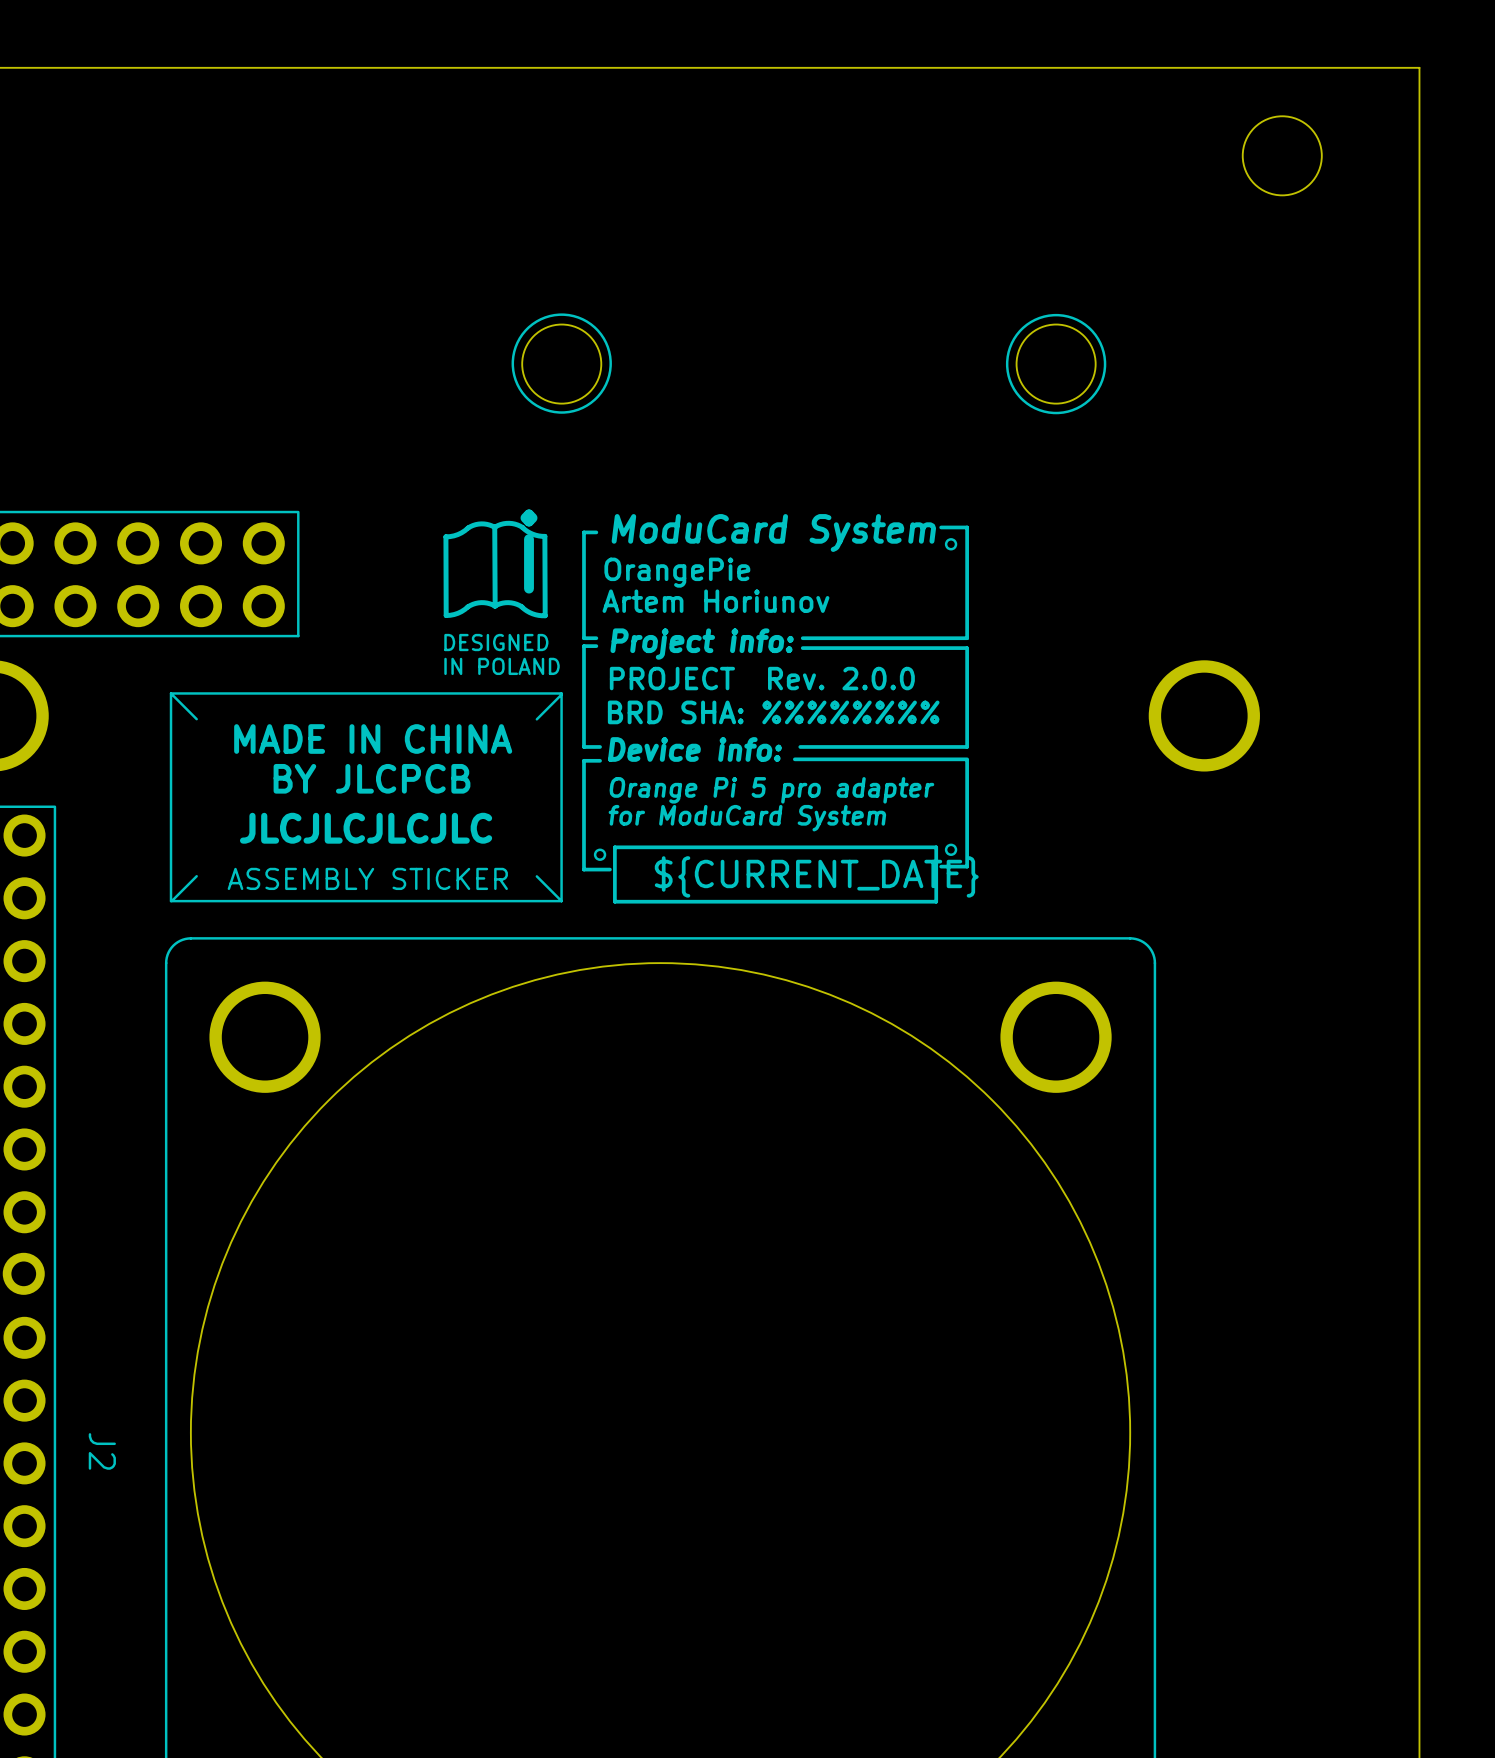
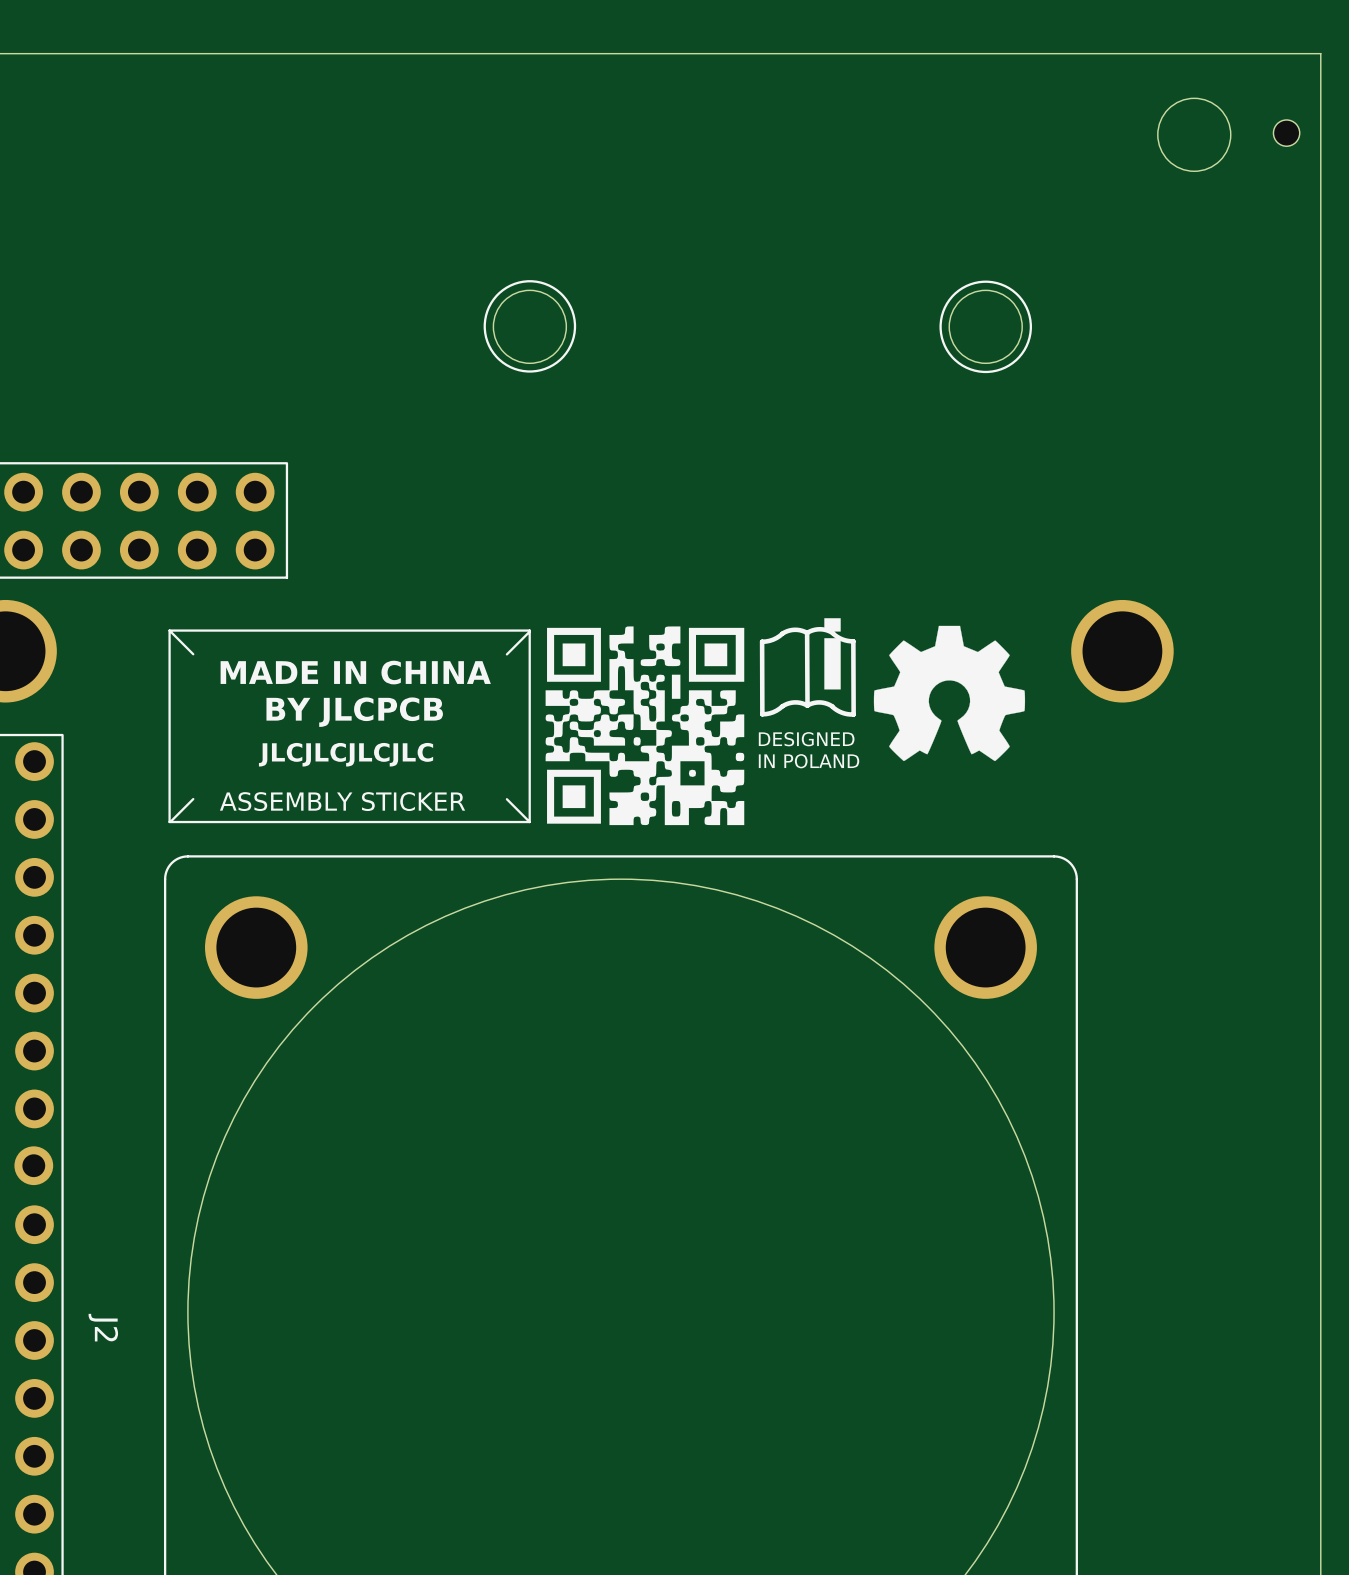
part: none -> (1286, 133)
line: (495, 526) (509, 523) (522, 527) -> (807, 632) (820, 629) (833, 633)
line: (522, 527) (532, 534) (544, 536) (545, 615) (532, 613) (521, 606) -> (832, 633) (842, 639) (853, 641) (853, 714) (842, 712) (832, 706)
line: (941, 527) (967, 527) (967, 638) (802, 638) -> none
line: (596, 532) (583, 532) (583, 638) (596, 638) -> none
text: ModuCard System (773, 533) -> none
drawing: [944, 538, 958, 551] -> none
text position: i (529, 551) -> i (832, 653)
text: OrangePie (677, 572) -> none
text: Artem Horiunov (715, 601) -> none
line: (468, 606) (457, 613) (446, 615) (445, 536) (457, 534) (475, 524) (486, 524) (494, 527) (495, 606) (481, 602) (467, 606) -> none
line: (494, 606) (508, 602) (522, 606) -> (807, 705) (819, 702) (832, 706)
text position: DESIGNED (496, 642) -> DESIGNED (806, 739)
text: Project info: (702, 644) -> none
line: (596, 646) (583, 646) (583, 746) (600, 746) -> none
line: (966, 648) (802, 648) -> none
line: (967, 648) (967, 746) -> none
text position: IN POLAND (502, 666) -> IN POLAND (809, 761)
text: PROJECT Rev. 2.0.0 (762, 678) -> none
drawing: none -> [873, 625, 1026, 762]
drawing: none -> [545, 626, 745, 826]
line: none -> (807, 632) (807, 705) (792, 702) (773, 712) (762, 714) (762, 641) (773, 639) (789, 630) (799, 630) (807, 632)
text: BRD SHA: %%%%%%%% (773, 712) -> none
line: (966, 746) (800, 746) -> none
text: Device info: (695, 749) -> none
line: (967, 759) (794, 759) -> none
line: (600, 760) (583, 760) (583, 869) (609, 869) -> none
line: (967, 760) (967, 866) (941, 866) -> none
text: Orange Pi 5 pro adapter (771, 790) -> none
drawing: none -> [258, 742, 434, 767]
text: for ModuCard System (747, 818) -> none
text: JLCJLCJLCJLC (366, 828) -> none
drawing: [944, 843, 958, 856] -> none
line: (936, 847) (614, 847) (614, 901) (936, 901) (936, 847) -> none
drawing: [593, 848, 607, 861] -> none
text: ${CURRENT_DATE} (816, 876) -> none

